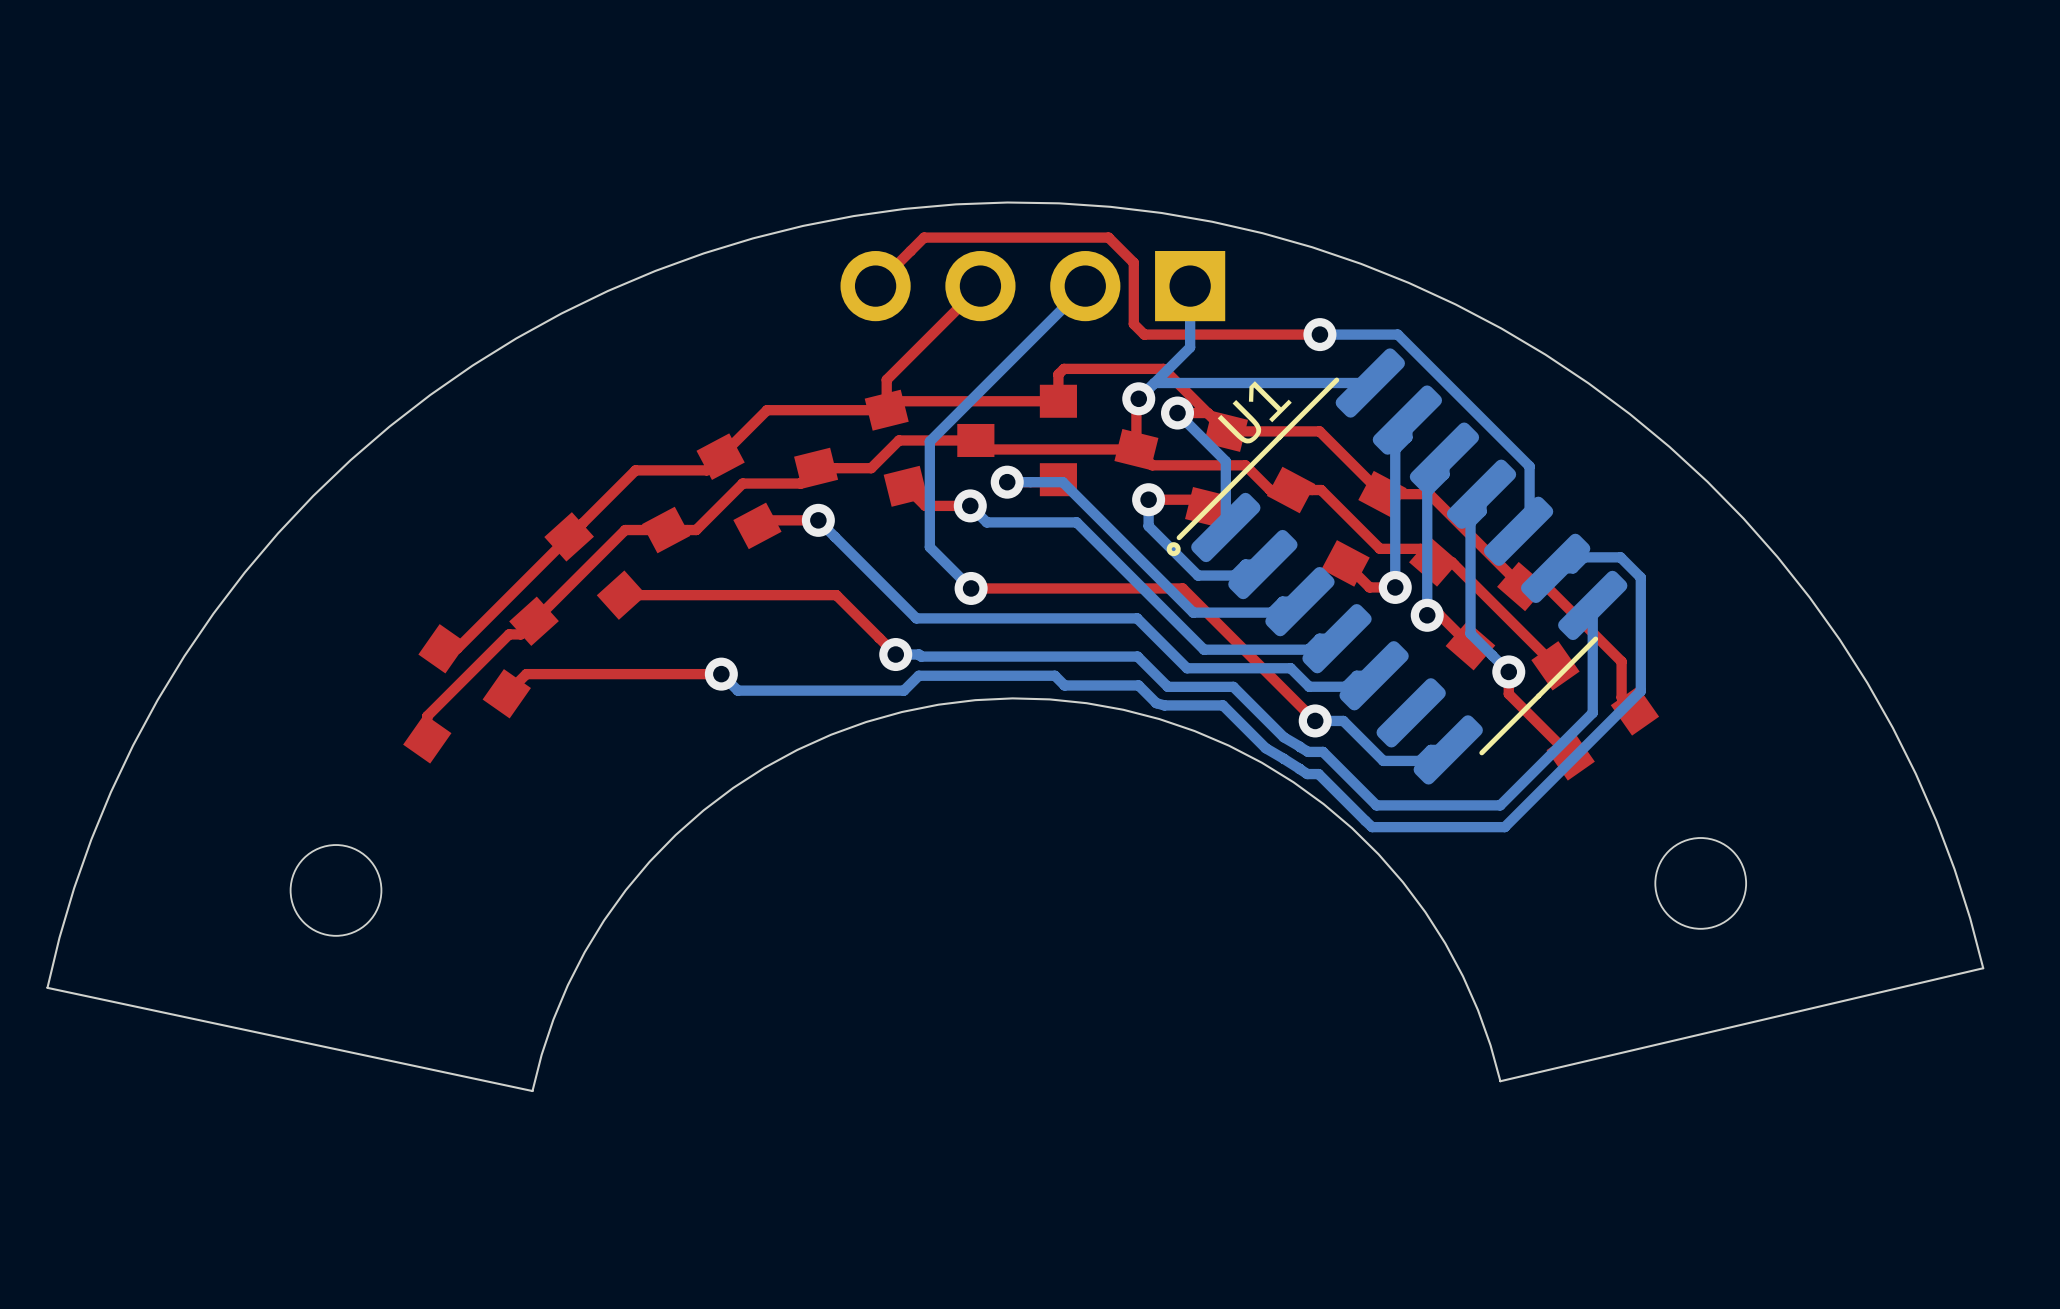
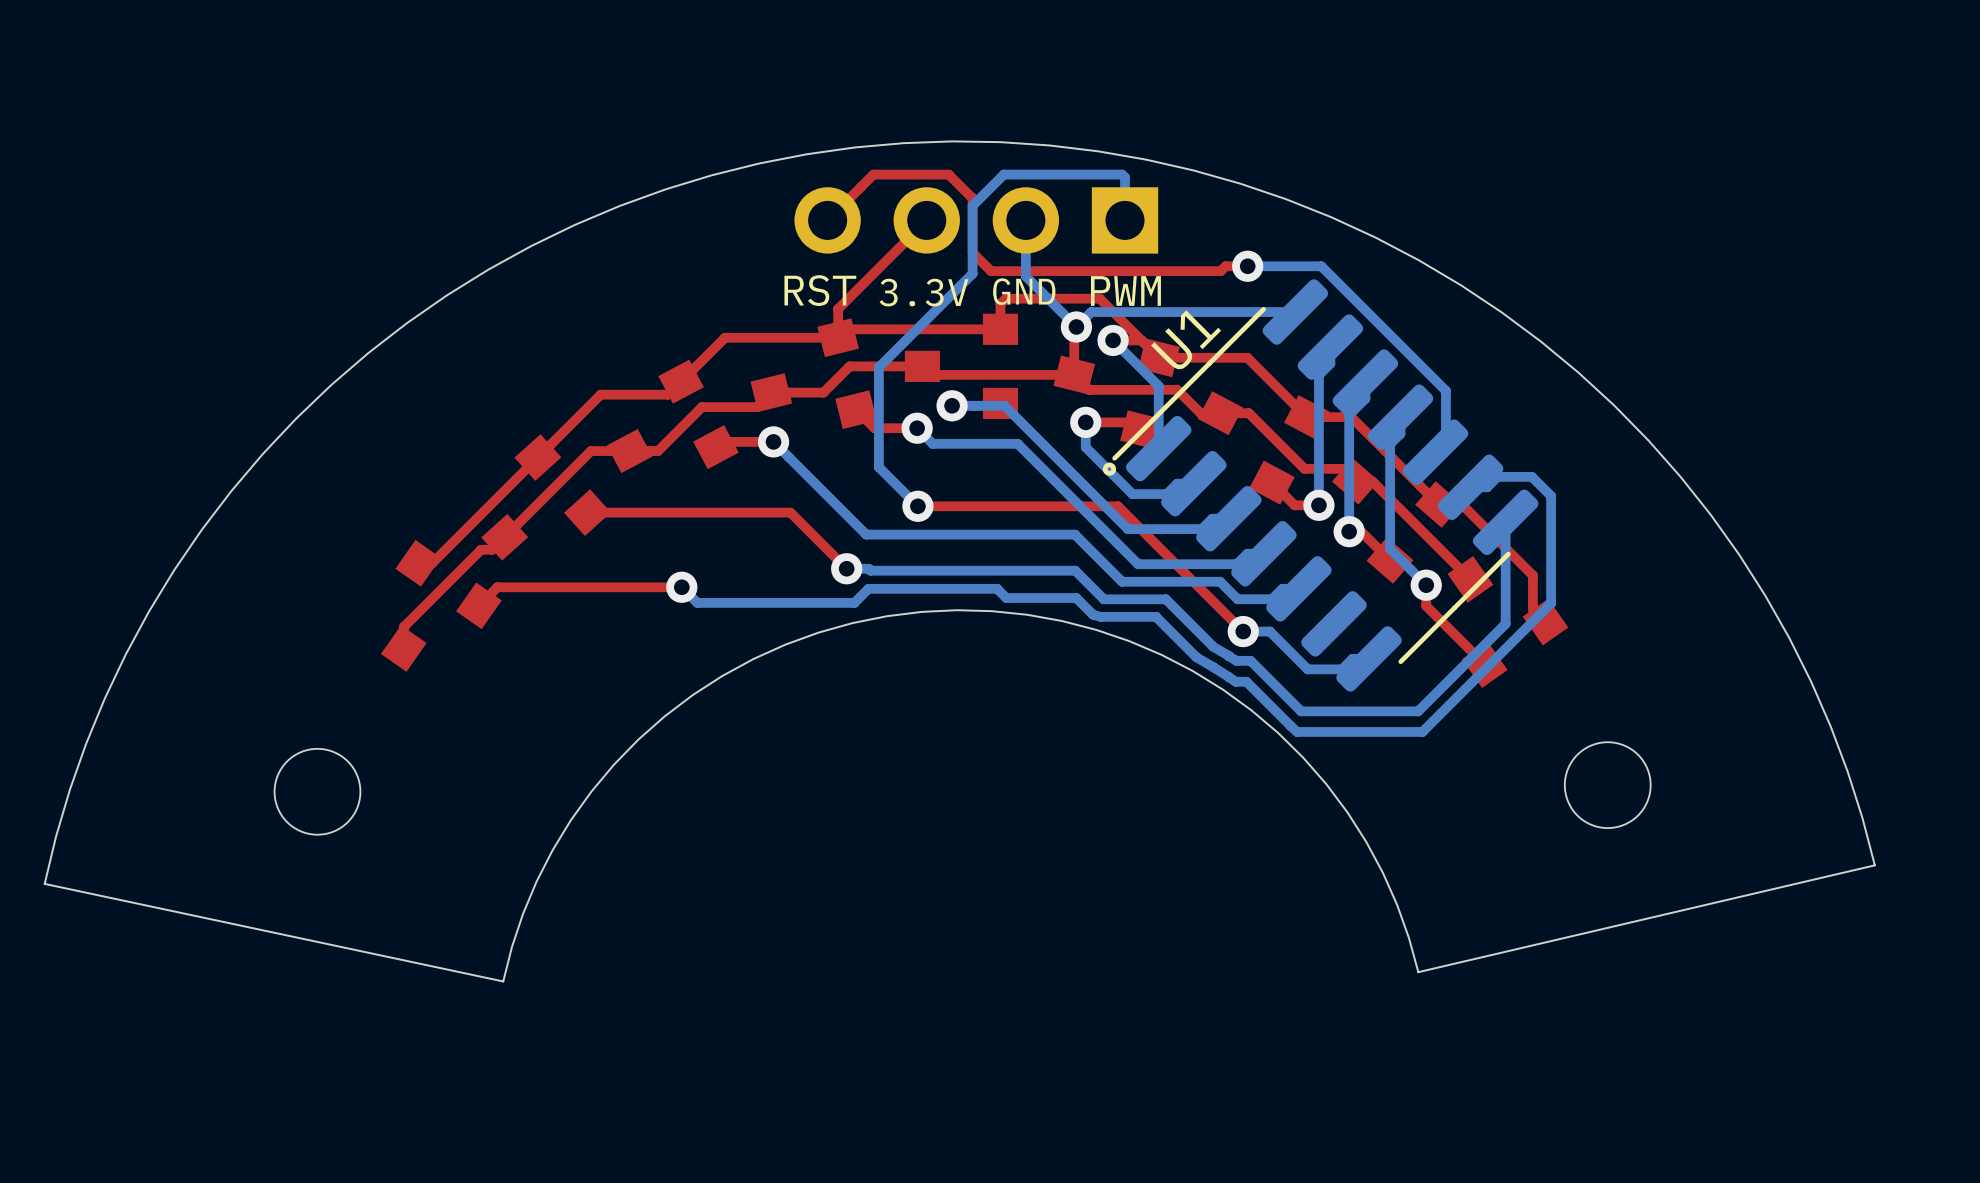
top track: (1003, 237) (1108, 237) (1133, 262) (1133, 324) (1144, 334) (1296, 334) -> (948, 174) (972, 198) (972, 252) (991, 271) (1220, 271) (1225, 266)
bottom track: (1085, 286) (1028, 342) -> (1125, 220) (1125, 177) (1122, 174) (1003, 174) (972, 205) (972, 273)
bottom track: none -> (1025, 220) (1025, 276) (1076, 326)
bottom track: (1190, 286) (1190, 347) (1154, 383) -> none
text: none -> RST (820, 290)
text: none -> PWM (1125, 291)
text: none -> GND (1024, 291)
text: none -> 3.3V (924, 292)

